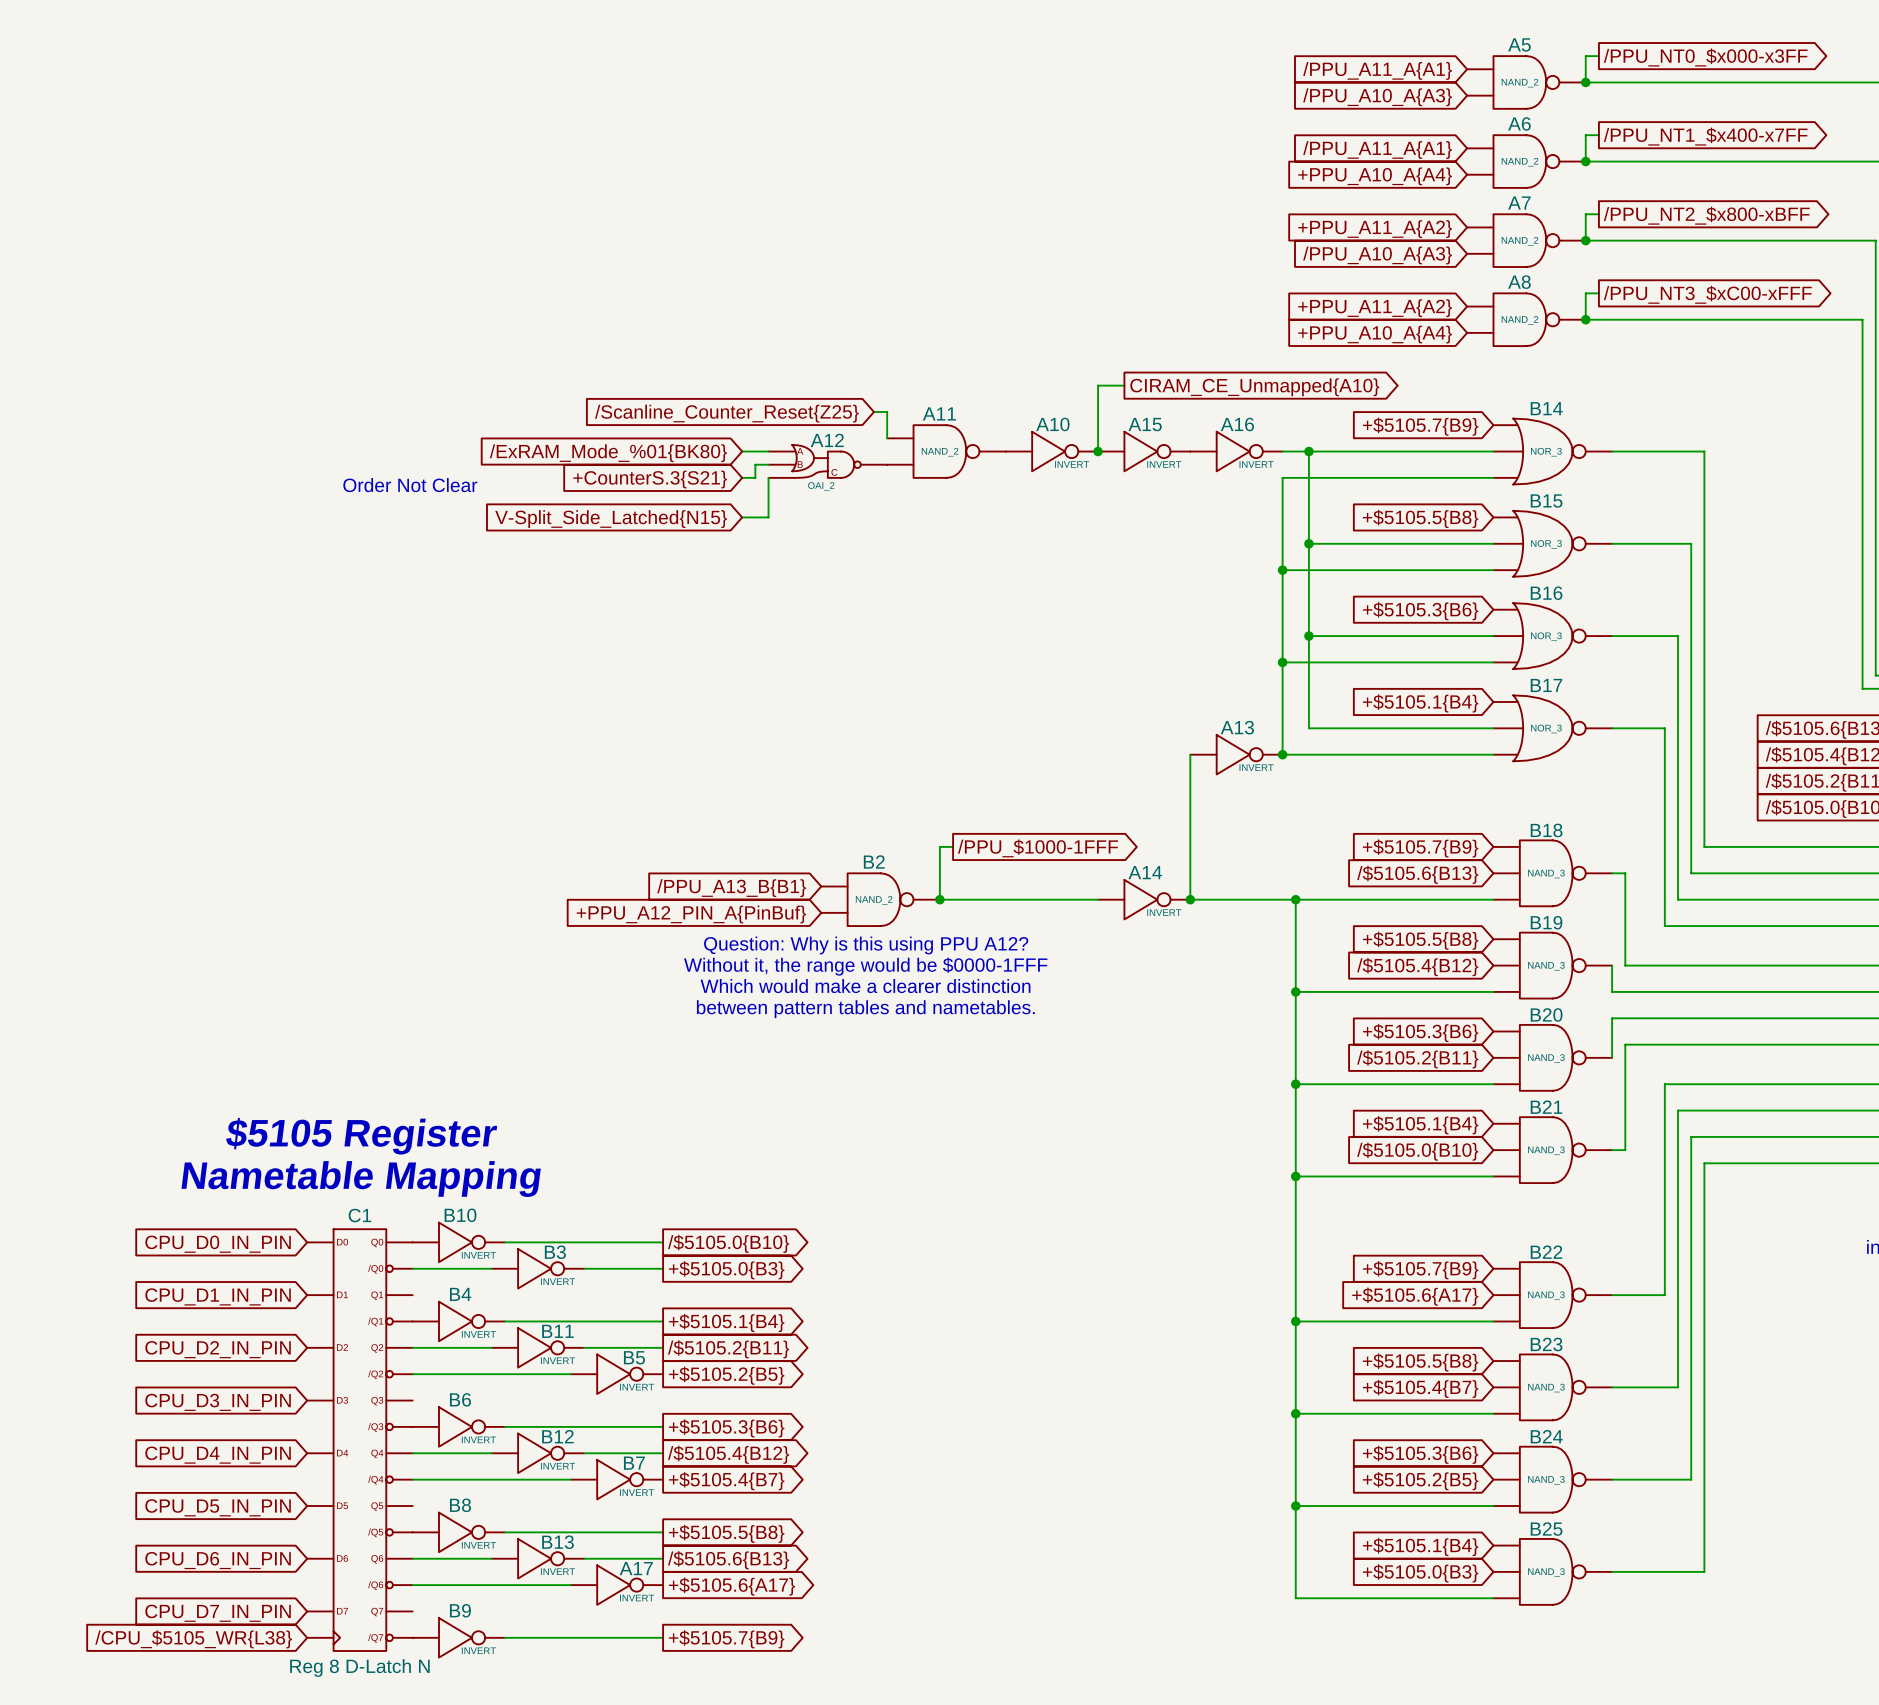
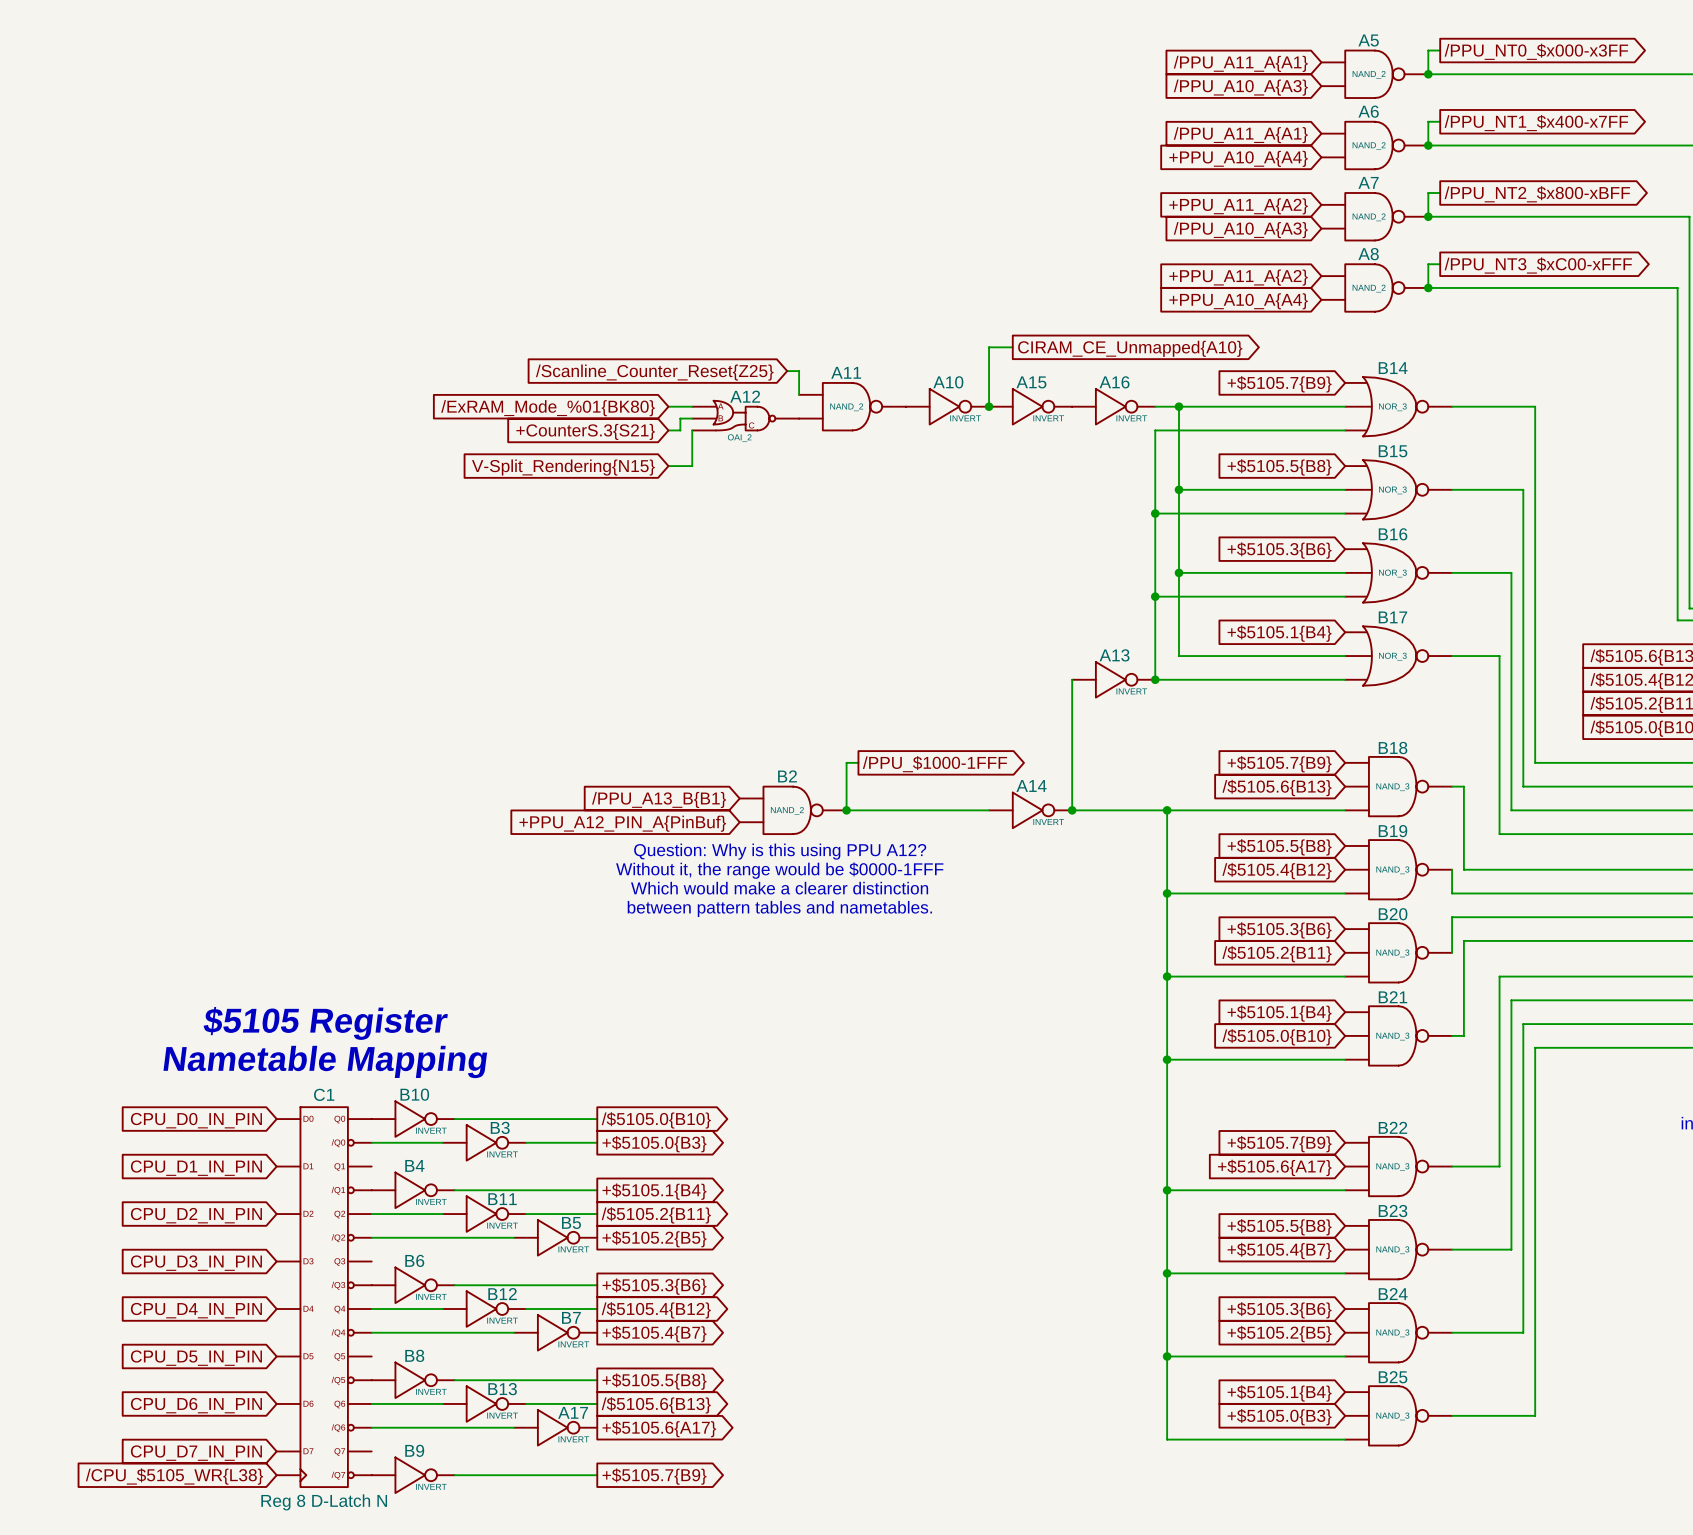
text: Order Not Clear (410, 485) -> none
global label: V-Split_Side_Latched{N15} (611, 519) -> V-Split_Rendering{N15} (563, 467)

